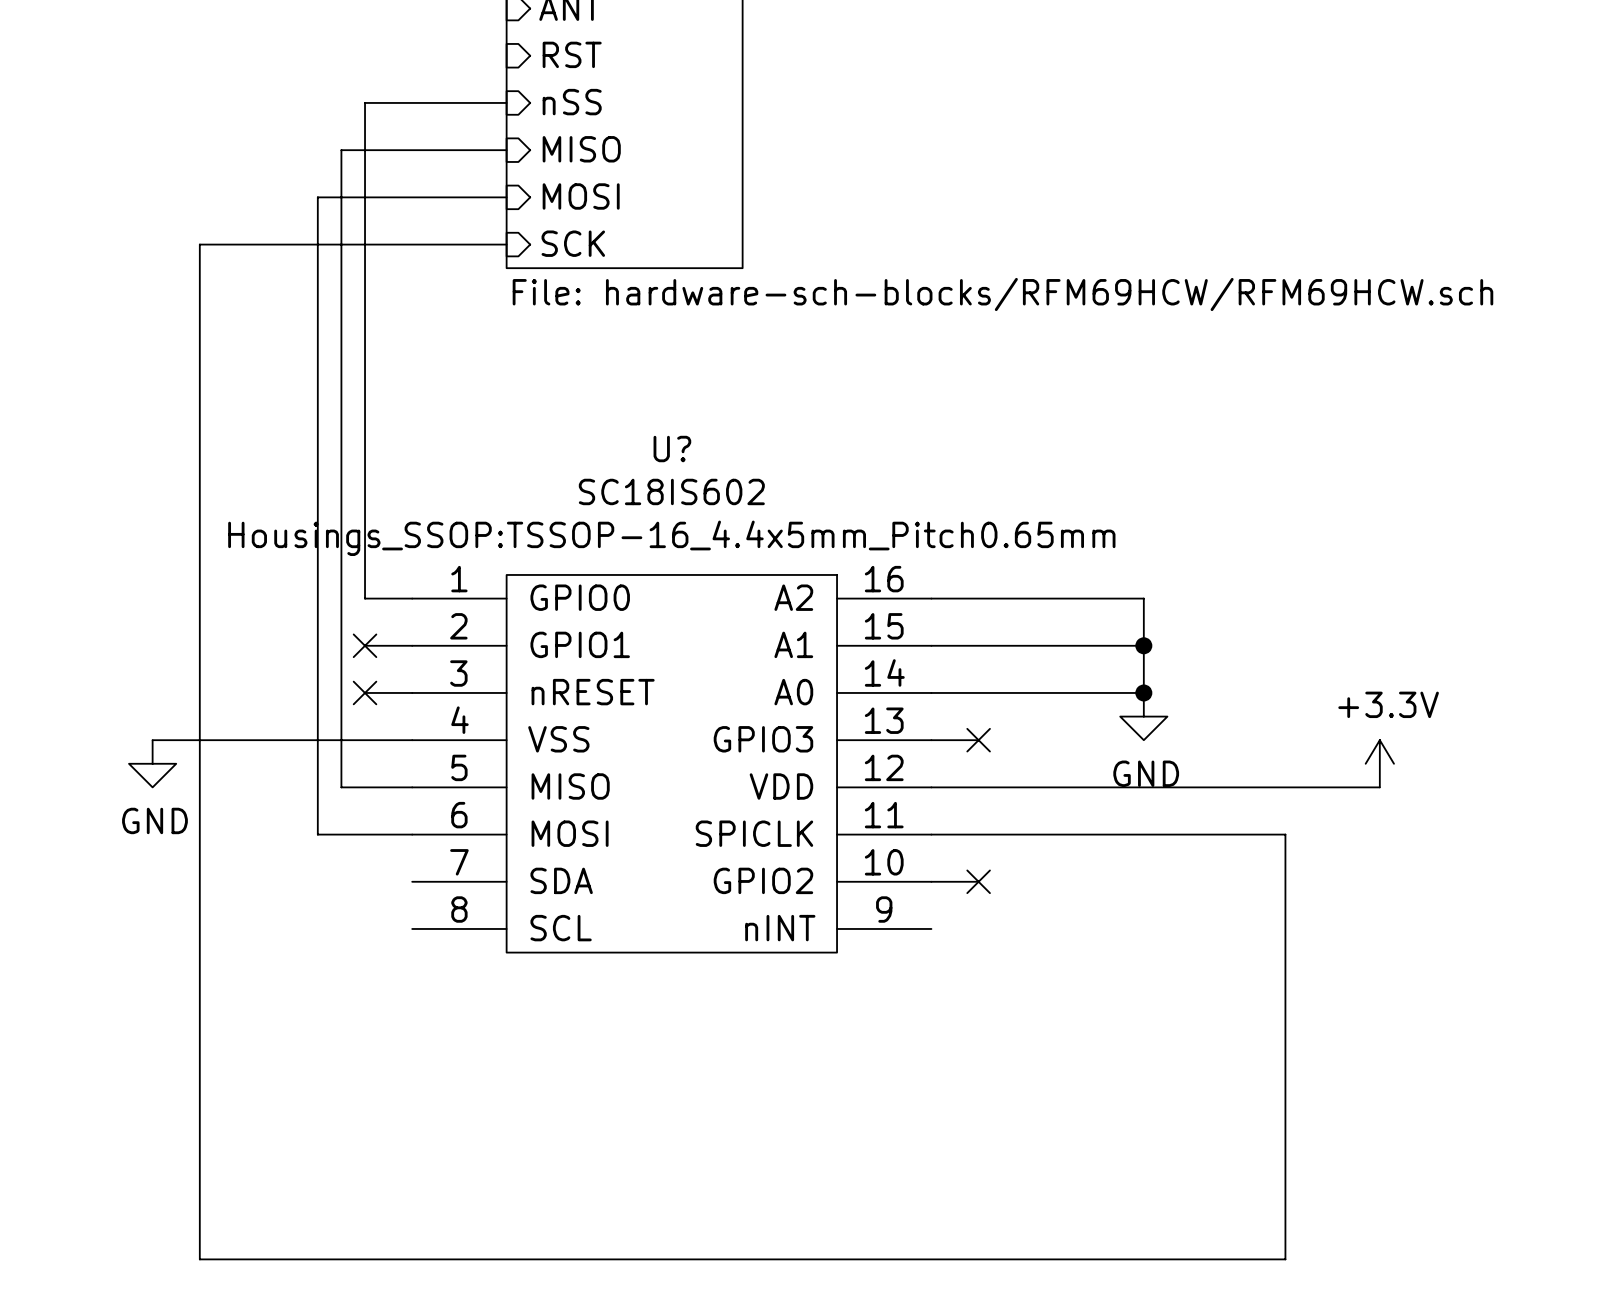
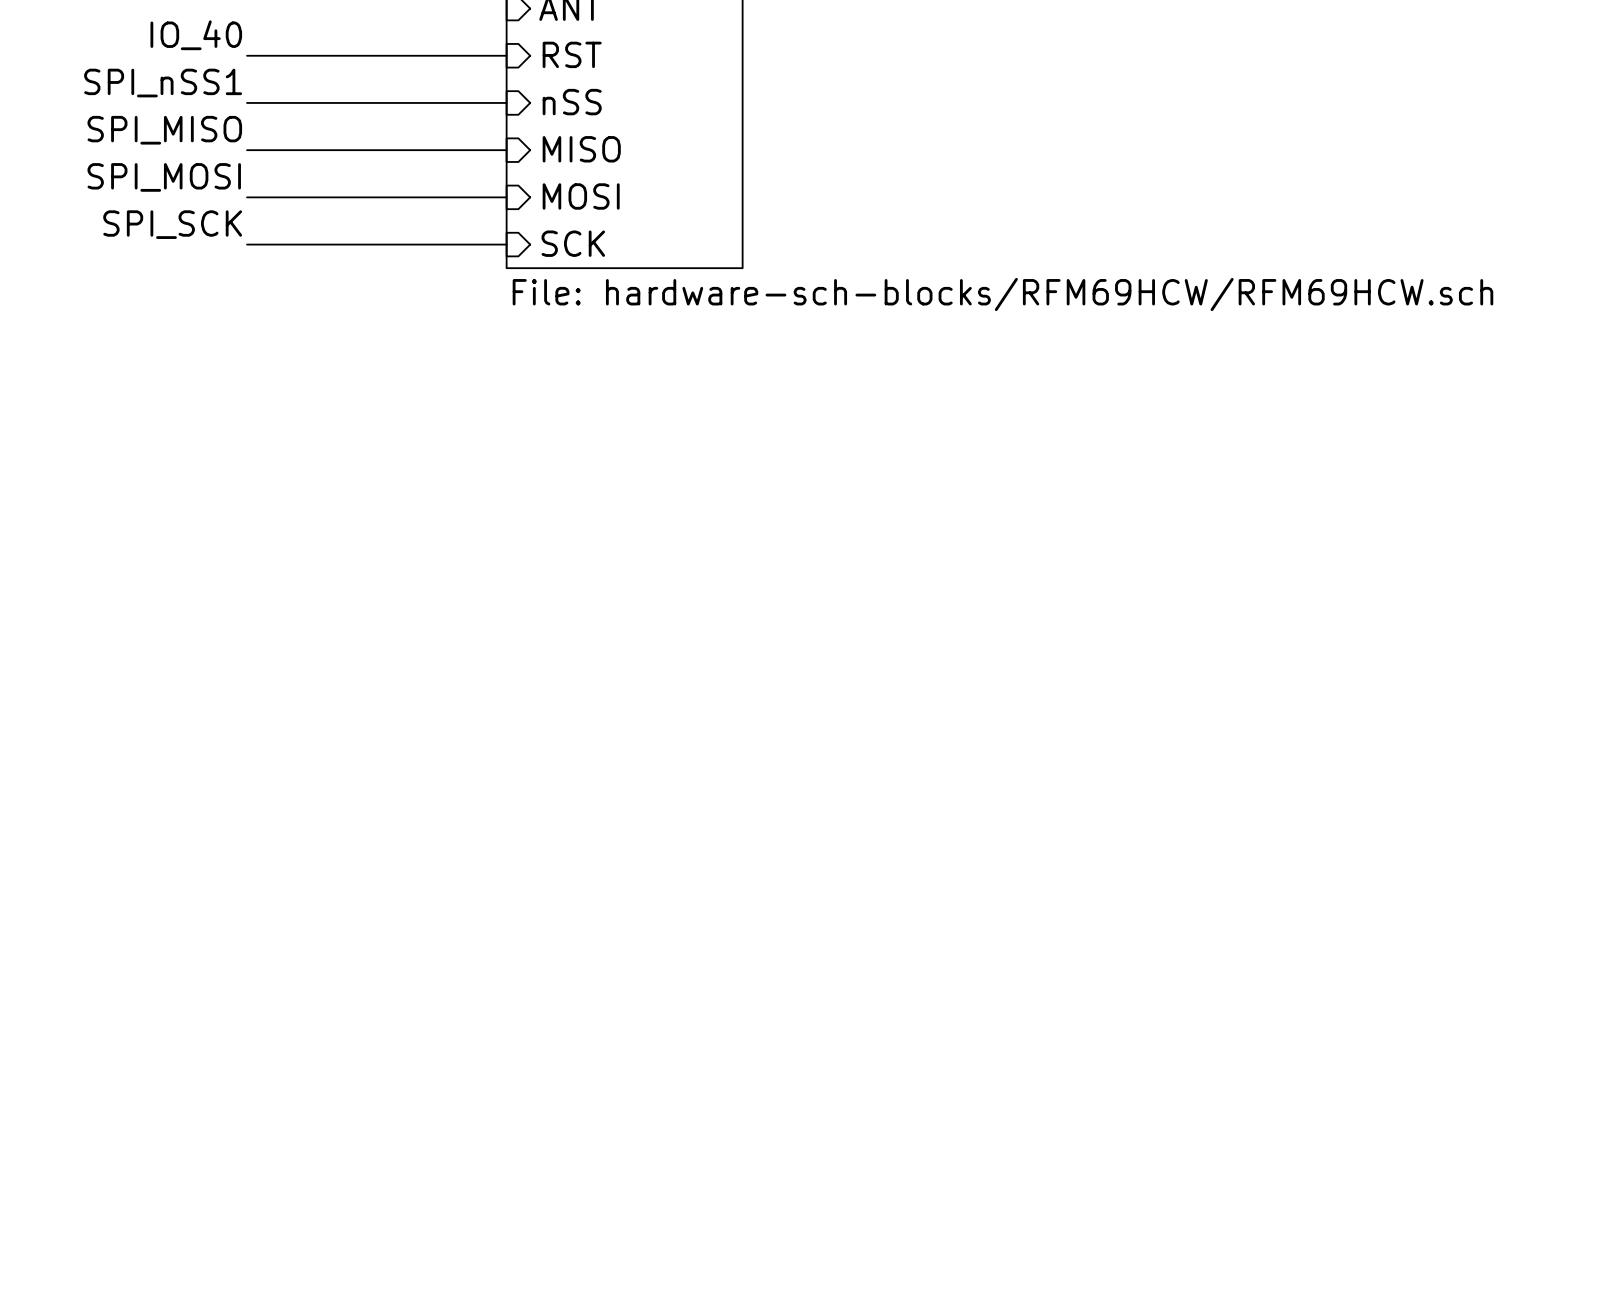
label: none -> IO_40 (196, 35)
wire: none -> (247, 55) (506, 55)
label: none -> SPI_nSS1 (163, 83)
wire: (365, 102) (365, 598) (412, 598) -> (365, 102) (247, 102)
label: none -> SPI_MISO (164, 130)
wire: (341, 150) (341, 787) (412, 787) -> (341, 150) (247, 150)
label: none -> SPI_MOSI (164, 177)
wire: (317, 197) (317, 834) (412, 834) -> (317, 197) (247, 197)
label: none -> SPI_SCK (172, 224)
wire: (247, 244) (199, 244) (199, 1259) (1285, 1259) (1285, 834) (931, 834) -> none
wire: (931, 598) (1143, 598) (1143, 692) (931, 692) -> none
wire: (365, 645) (412, 645) -> none
no-connect mark: (365, 645) -> none
wire: (931, 645) (1143, 645) -> none
junction: (1143, 645) -> none
wire: (365, 692) (412, 692) -> none
no-connect mark: (365, 692) -> none
junction: (1143, 692) -> none
power symbol: GND (1143, 716) -> none
wire: (152, 740) (412, 740) -> none
wire: (931, 740) (978, 740) -> none
no-connect mark: (978, 740) -> none
power symbol: GND (152, 763) -> none
U?: SC18IS602 (671, 763) -> none
power symbol: +3.3V (1379, 763) -> none
wire: (931, 787) (1379, 787) -> none
wire: (931, 881) (978, 881) -> none
no-connect mark: (978, 881) -> none

